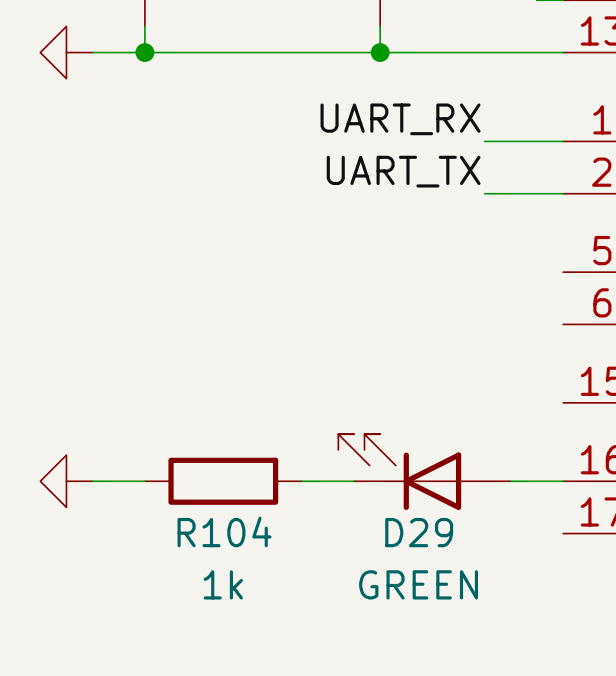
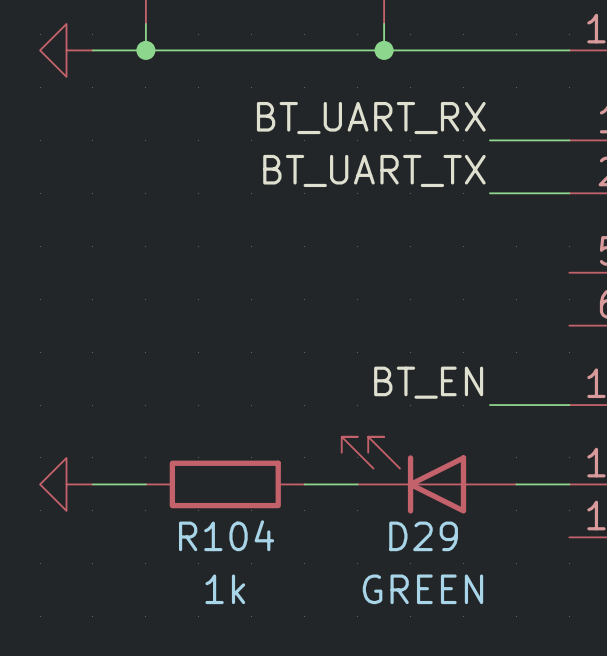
label: UART_RX (400, 119) -> BT_UART_RX (371, 118)
label: UART_TX (403, 171) -> BT_UART_TX (374, 170)
label: none -> BT_EN (428, 382)
wire: none -> (489, 405) (569, 405)

